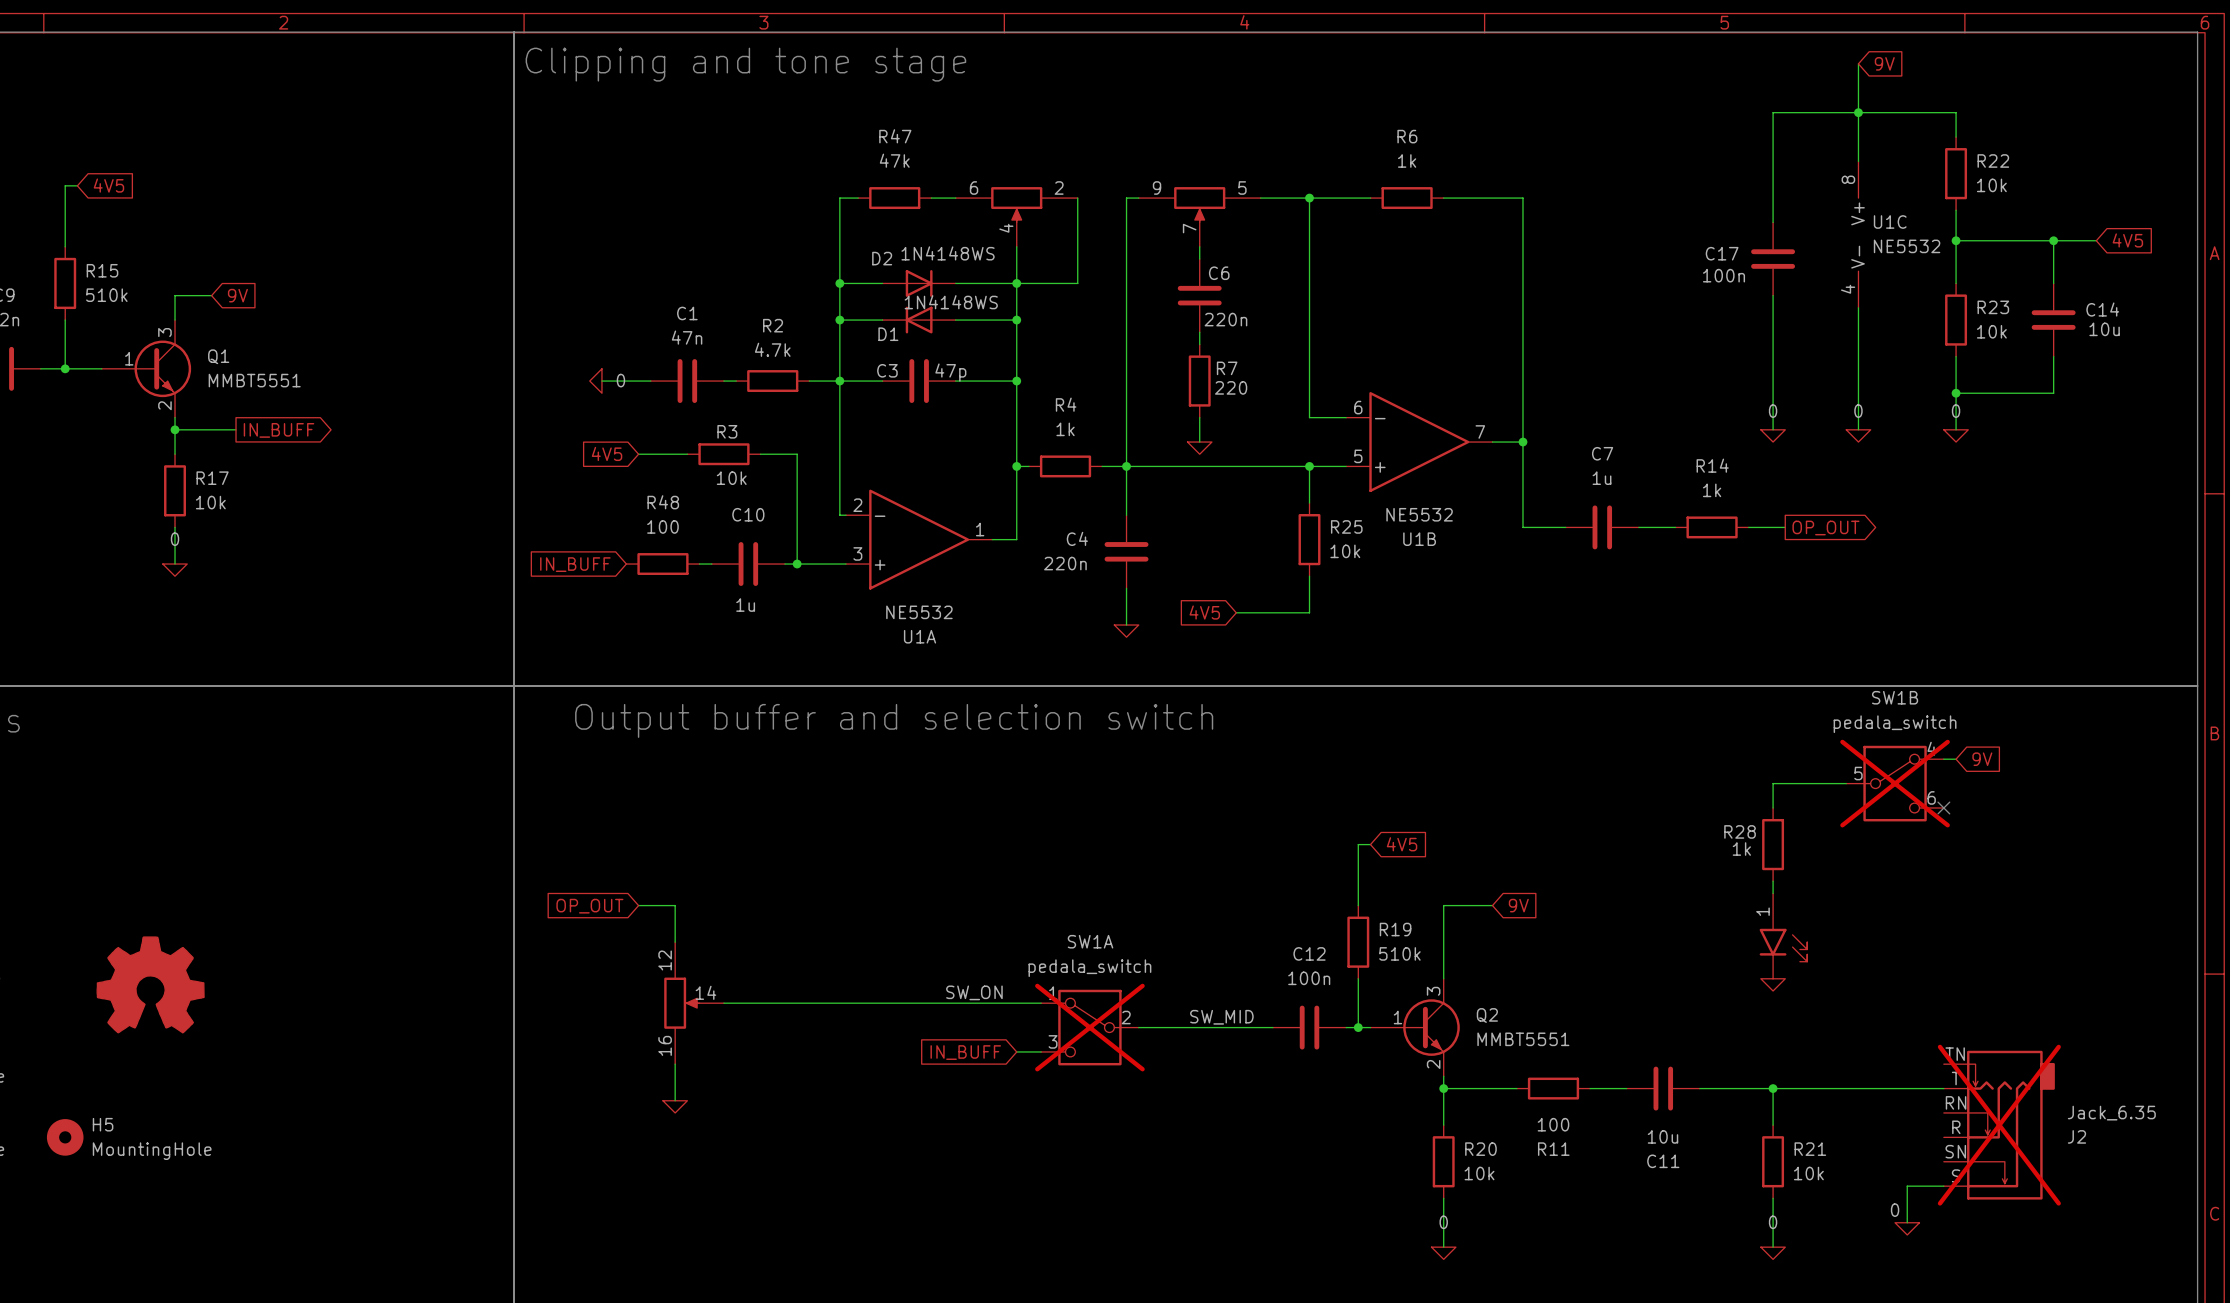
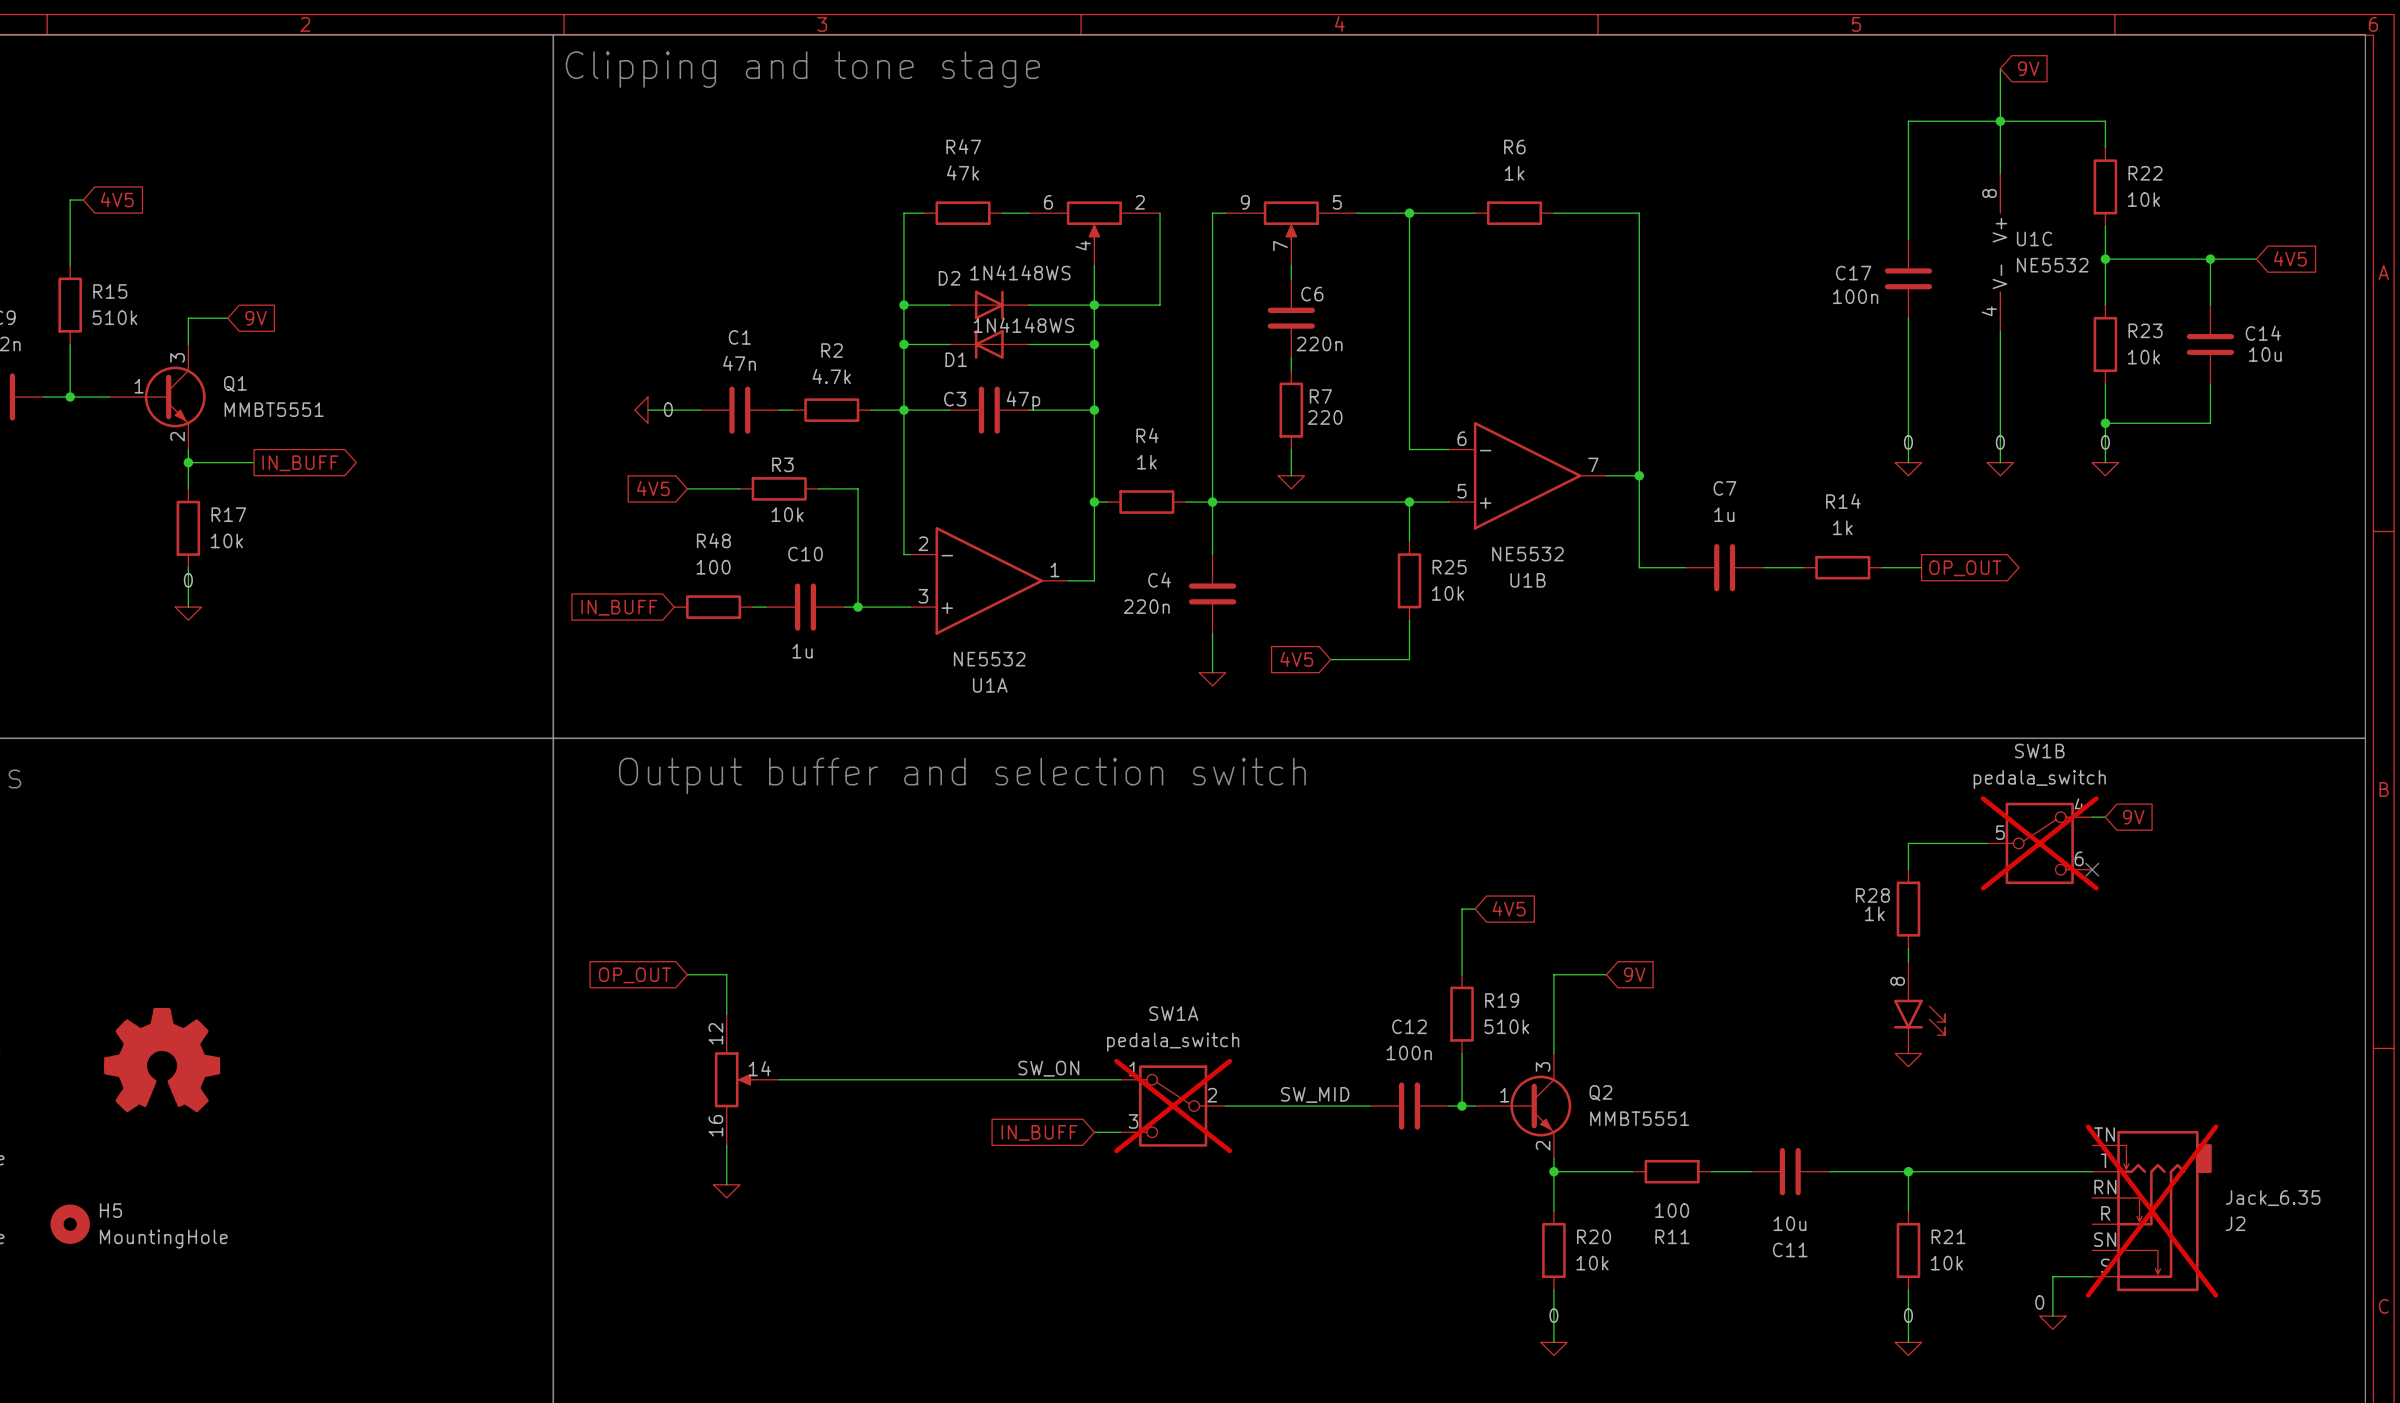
part pin number: 1 (1763, 911) -> 8 (1897, 981)

